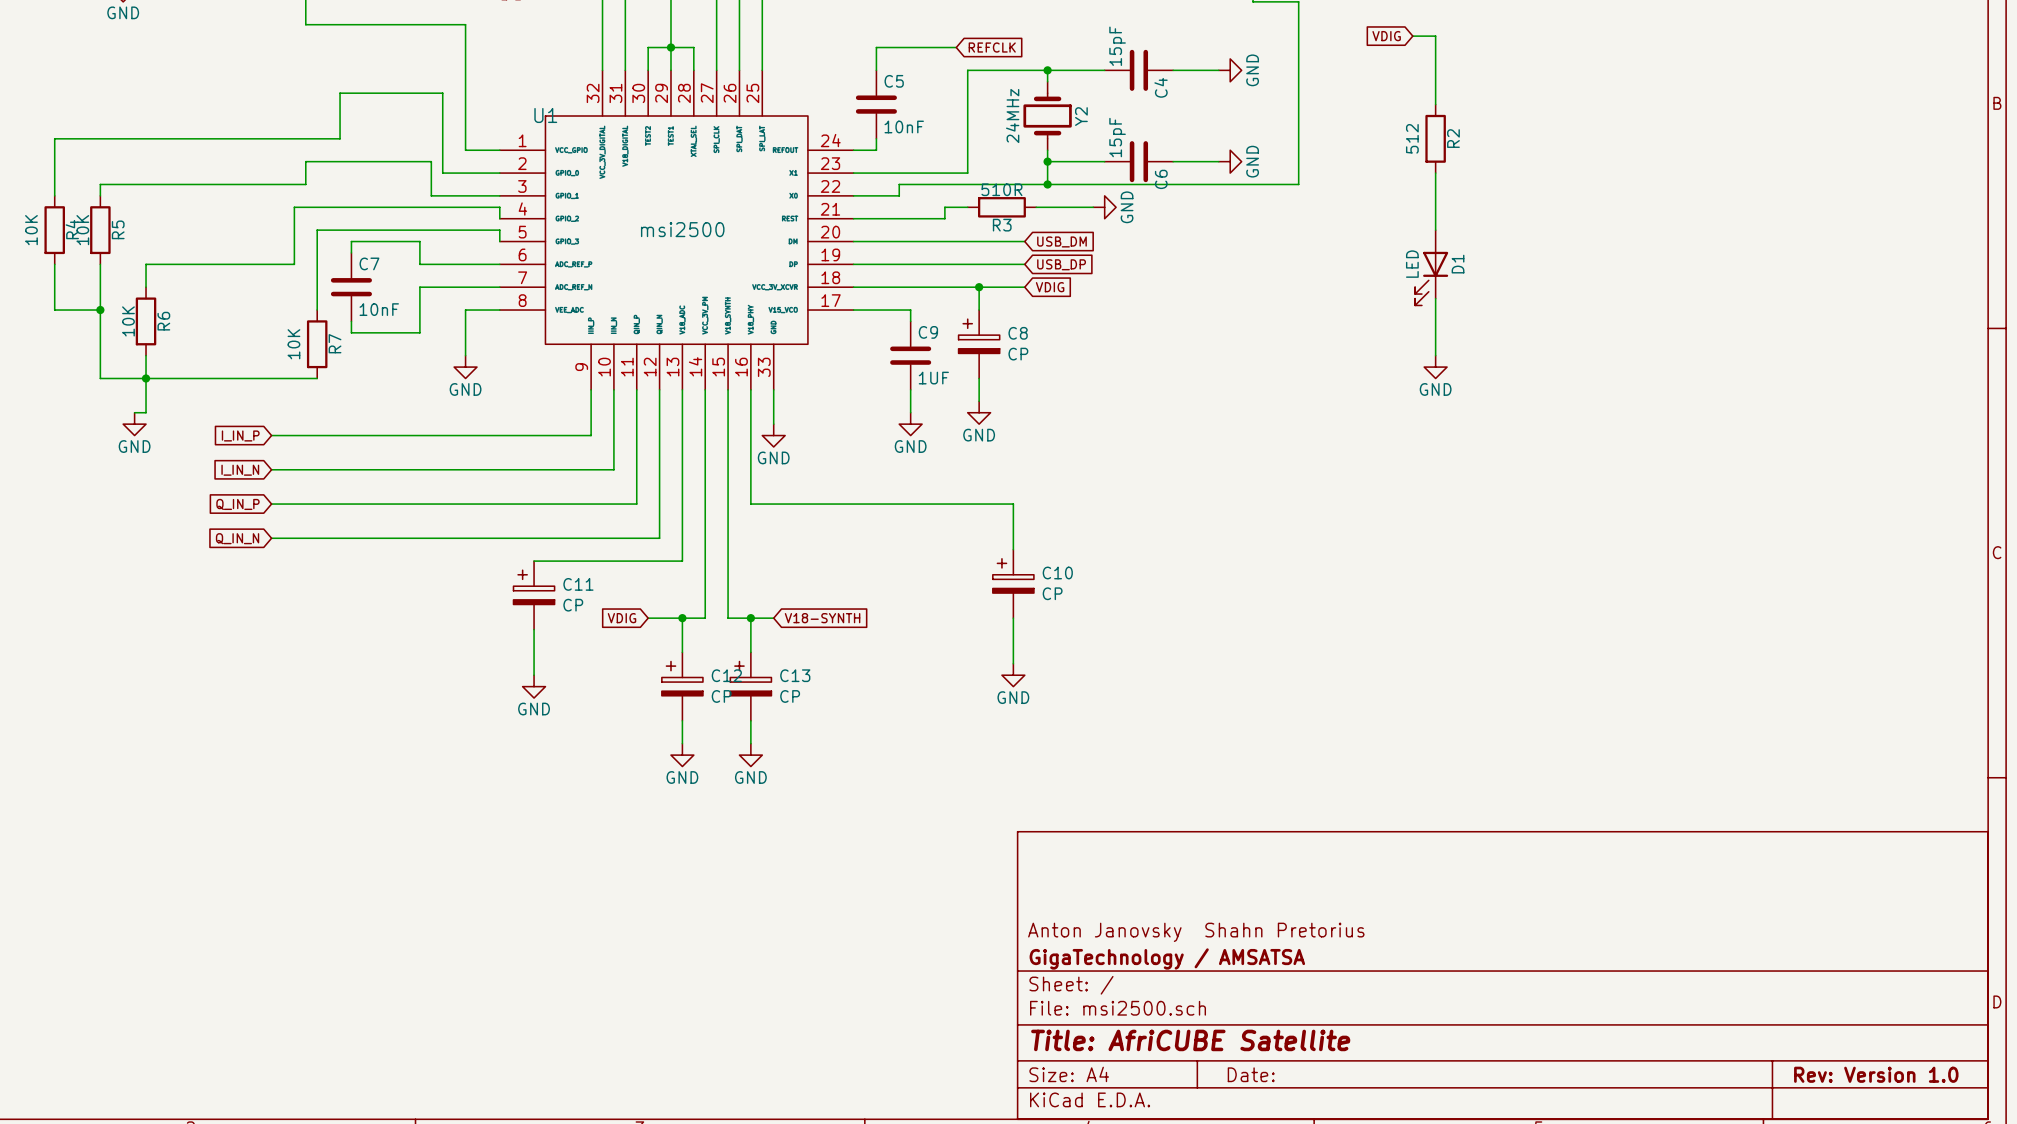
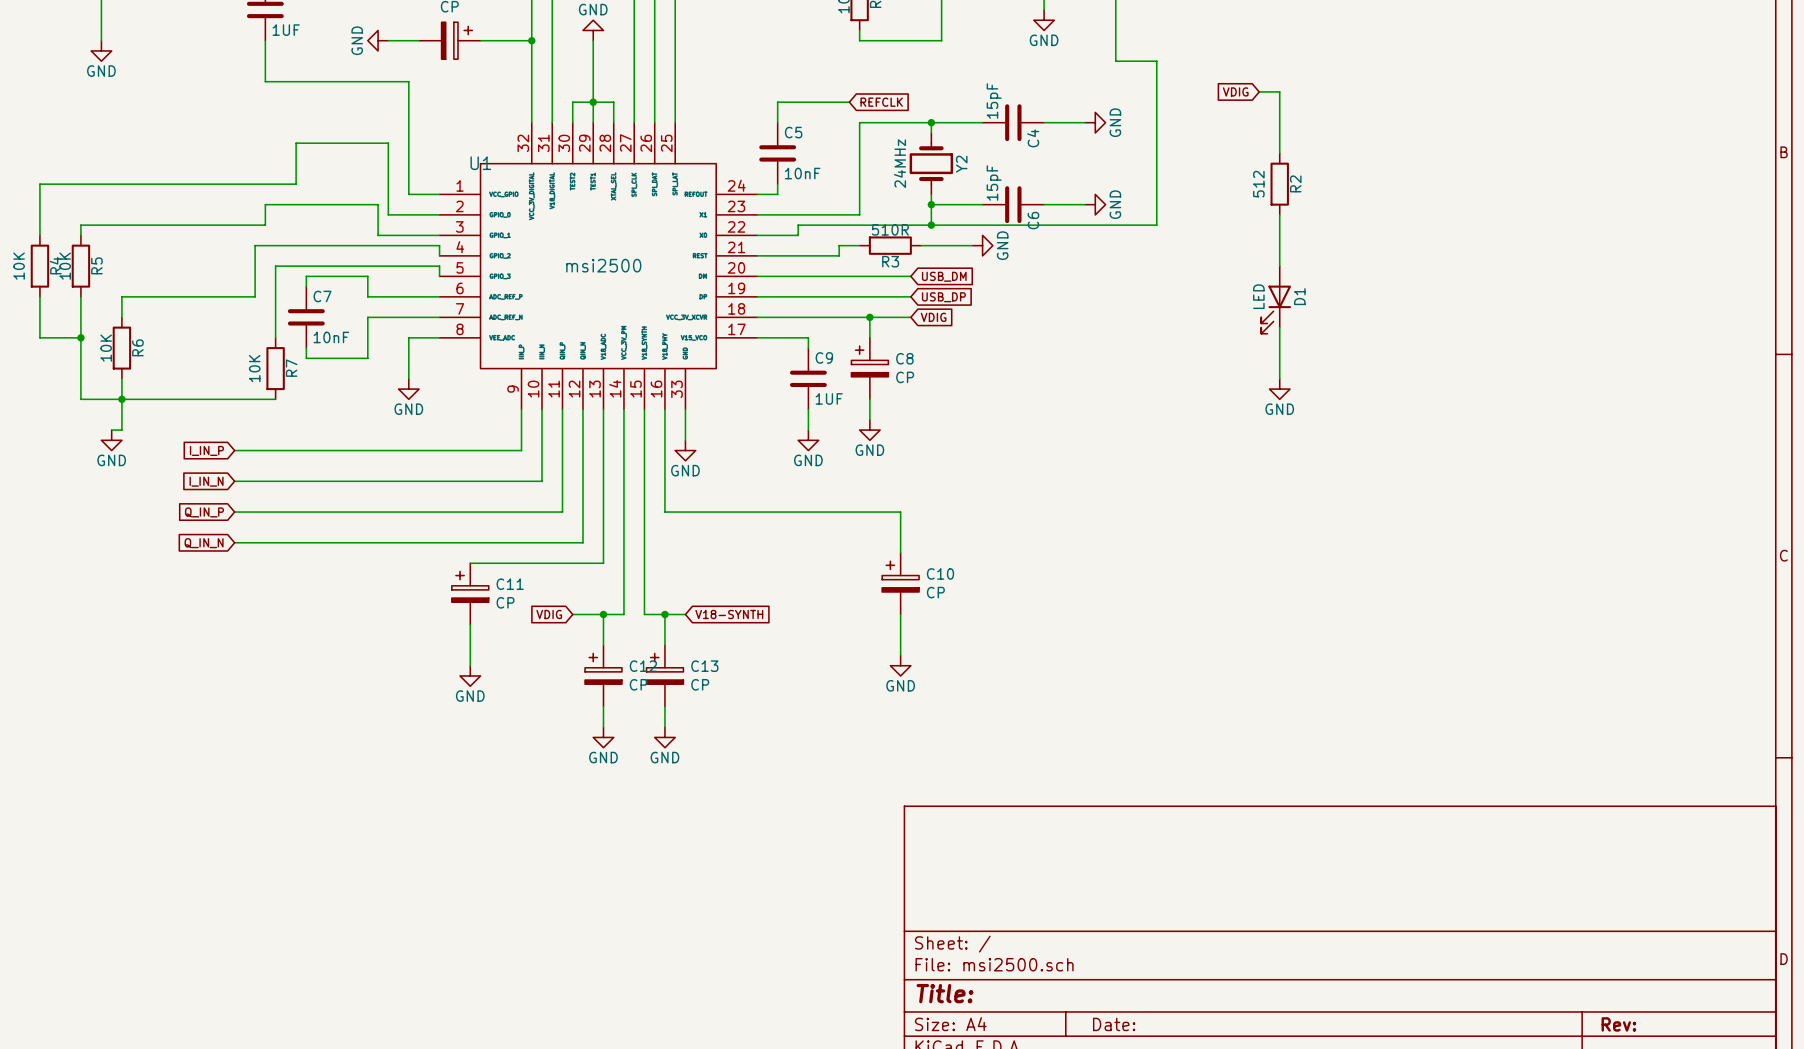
title block: Anton Janovsky Shahn Pretorius (1196, 932) -> none
title block: GigaTechnology / AMSATSA (1167, 958) -> none
title block: Title: AfriCUBE Satellite (1190, 1040) -> Title: (945, 993)
title block: Rev: Version 1.0 (1876, 1074) -> Rev: (1618, 1024)

